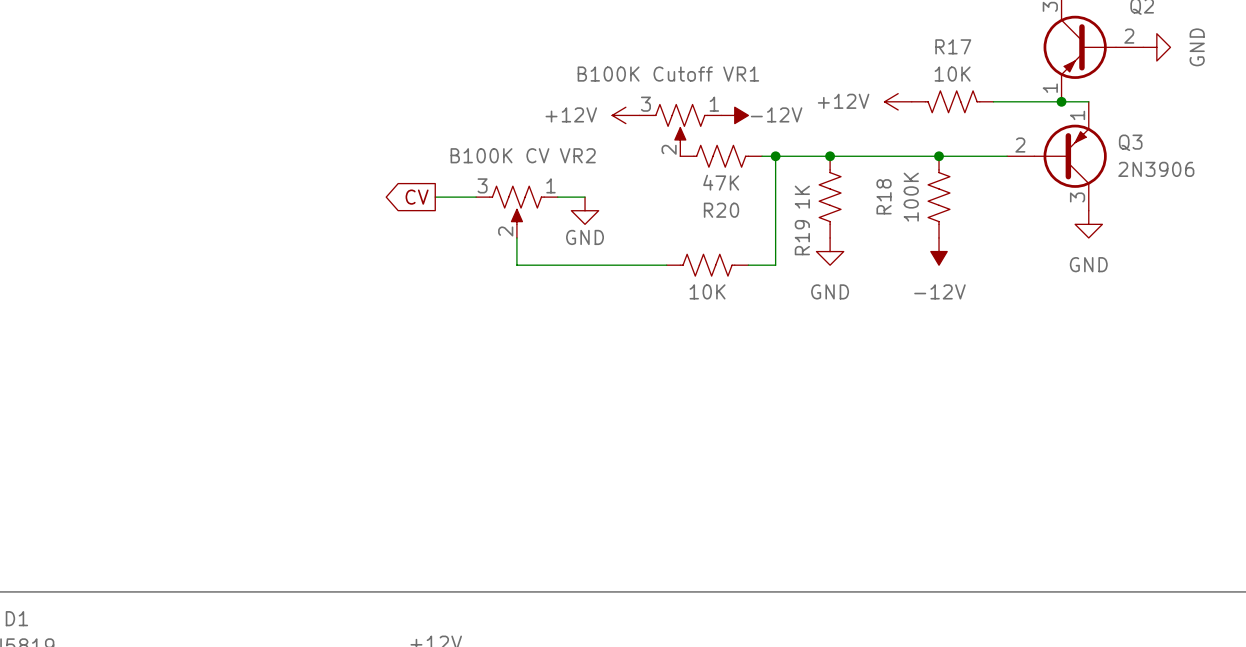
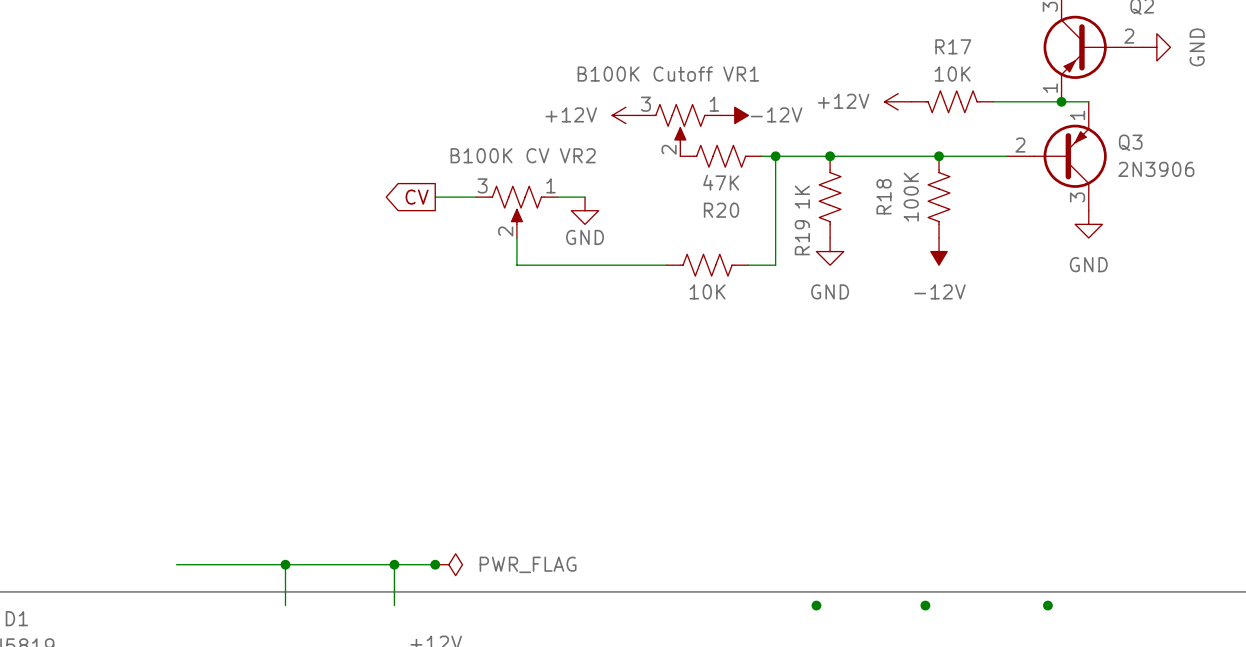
wire: none -> (176, 564) (435, 564)
wire: none -> (285, 564) (285, 605)
junction: none -> (285, 564)
wire: none -> (394, 564) (394, 605)
junction: none -> (394, 564)
junction: none -> (435, 564)
power symbol: none -> PWR_FLAG (448, 564)
junction: none -> (816, 605)
junction: none -> (925, 605)
junction: none -> (1047, 605)

